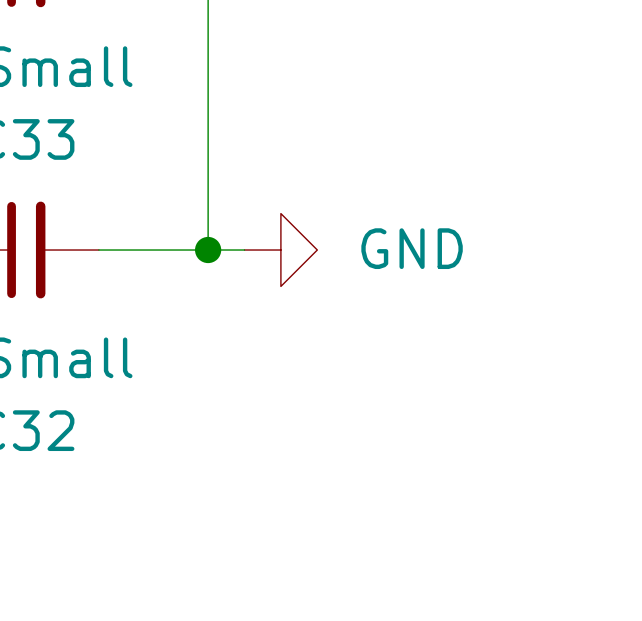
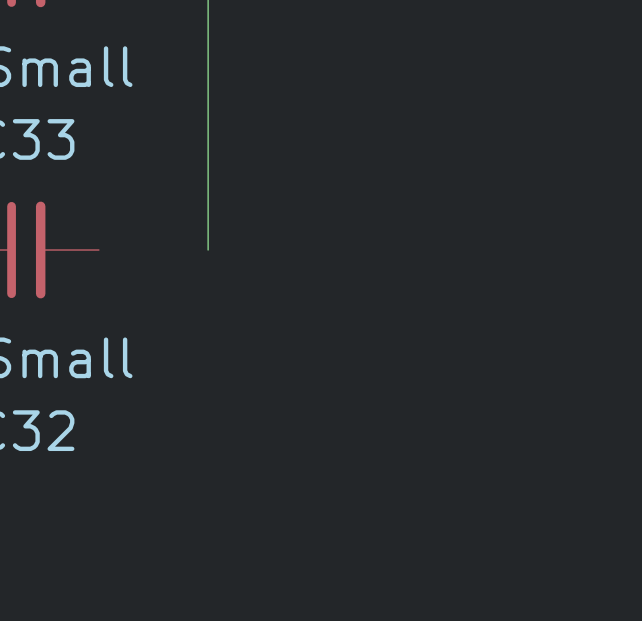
wire: (98, 250) (244, 250) -> none
junction: (208, 250) -> none
power symbol: GND (280, 250) -> none

